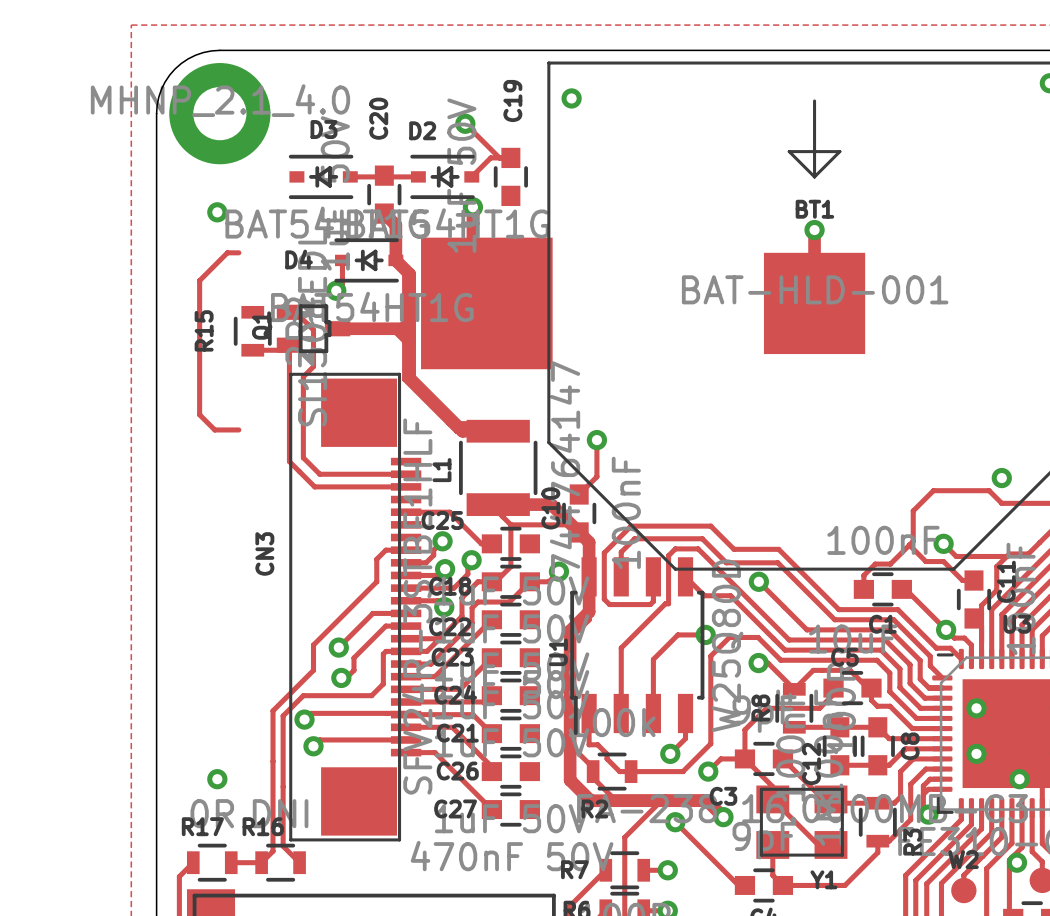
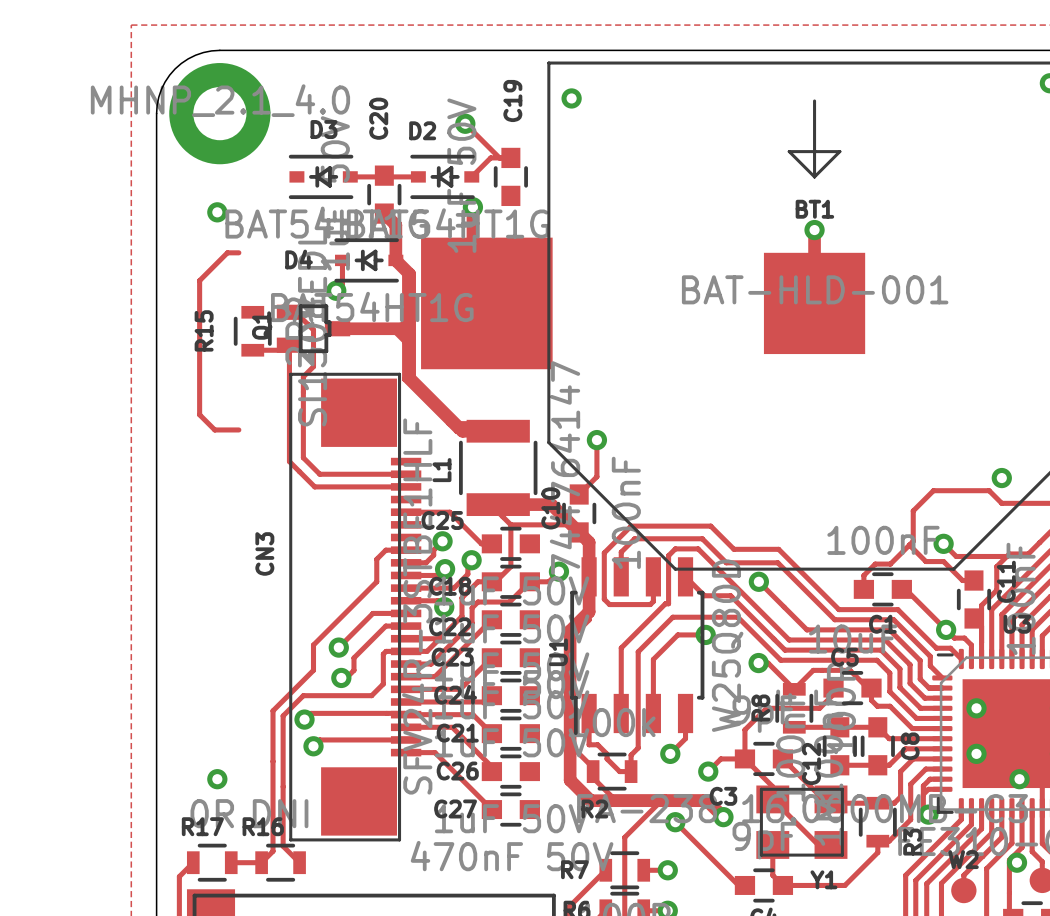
track: (758, 637) (729, 637) (710, 656) (710, 743) (682, 771) (631, 771) -> (758, 637) (737, 617) (672, 617) (638, 651) (638, 748) (631, 755) (631, 771)

